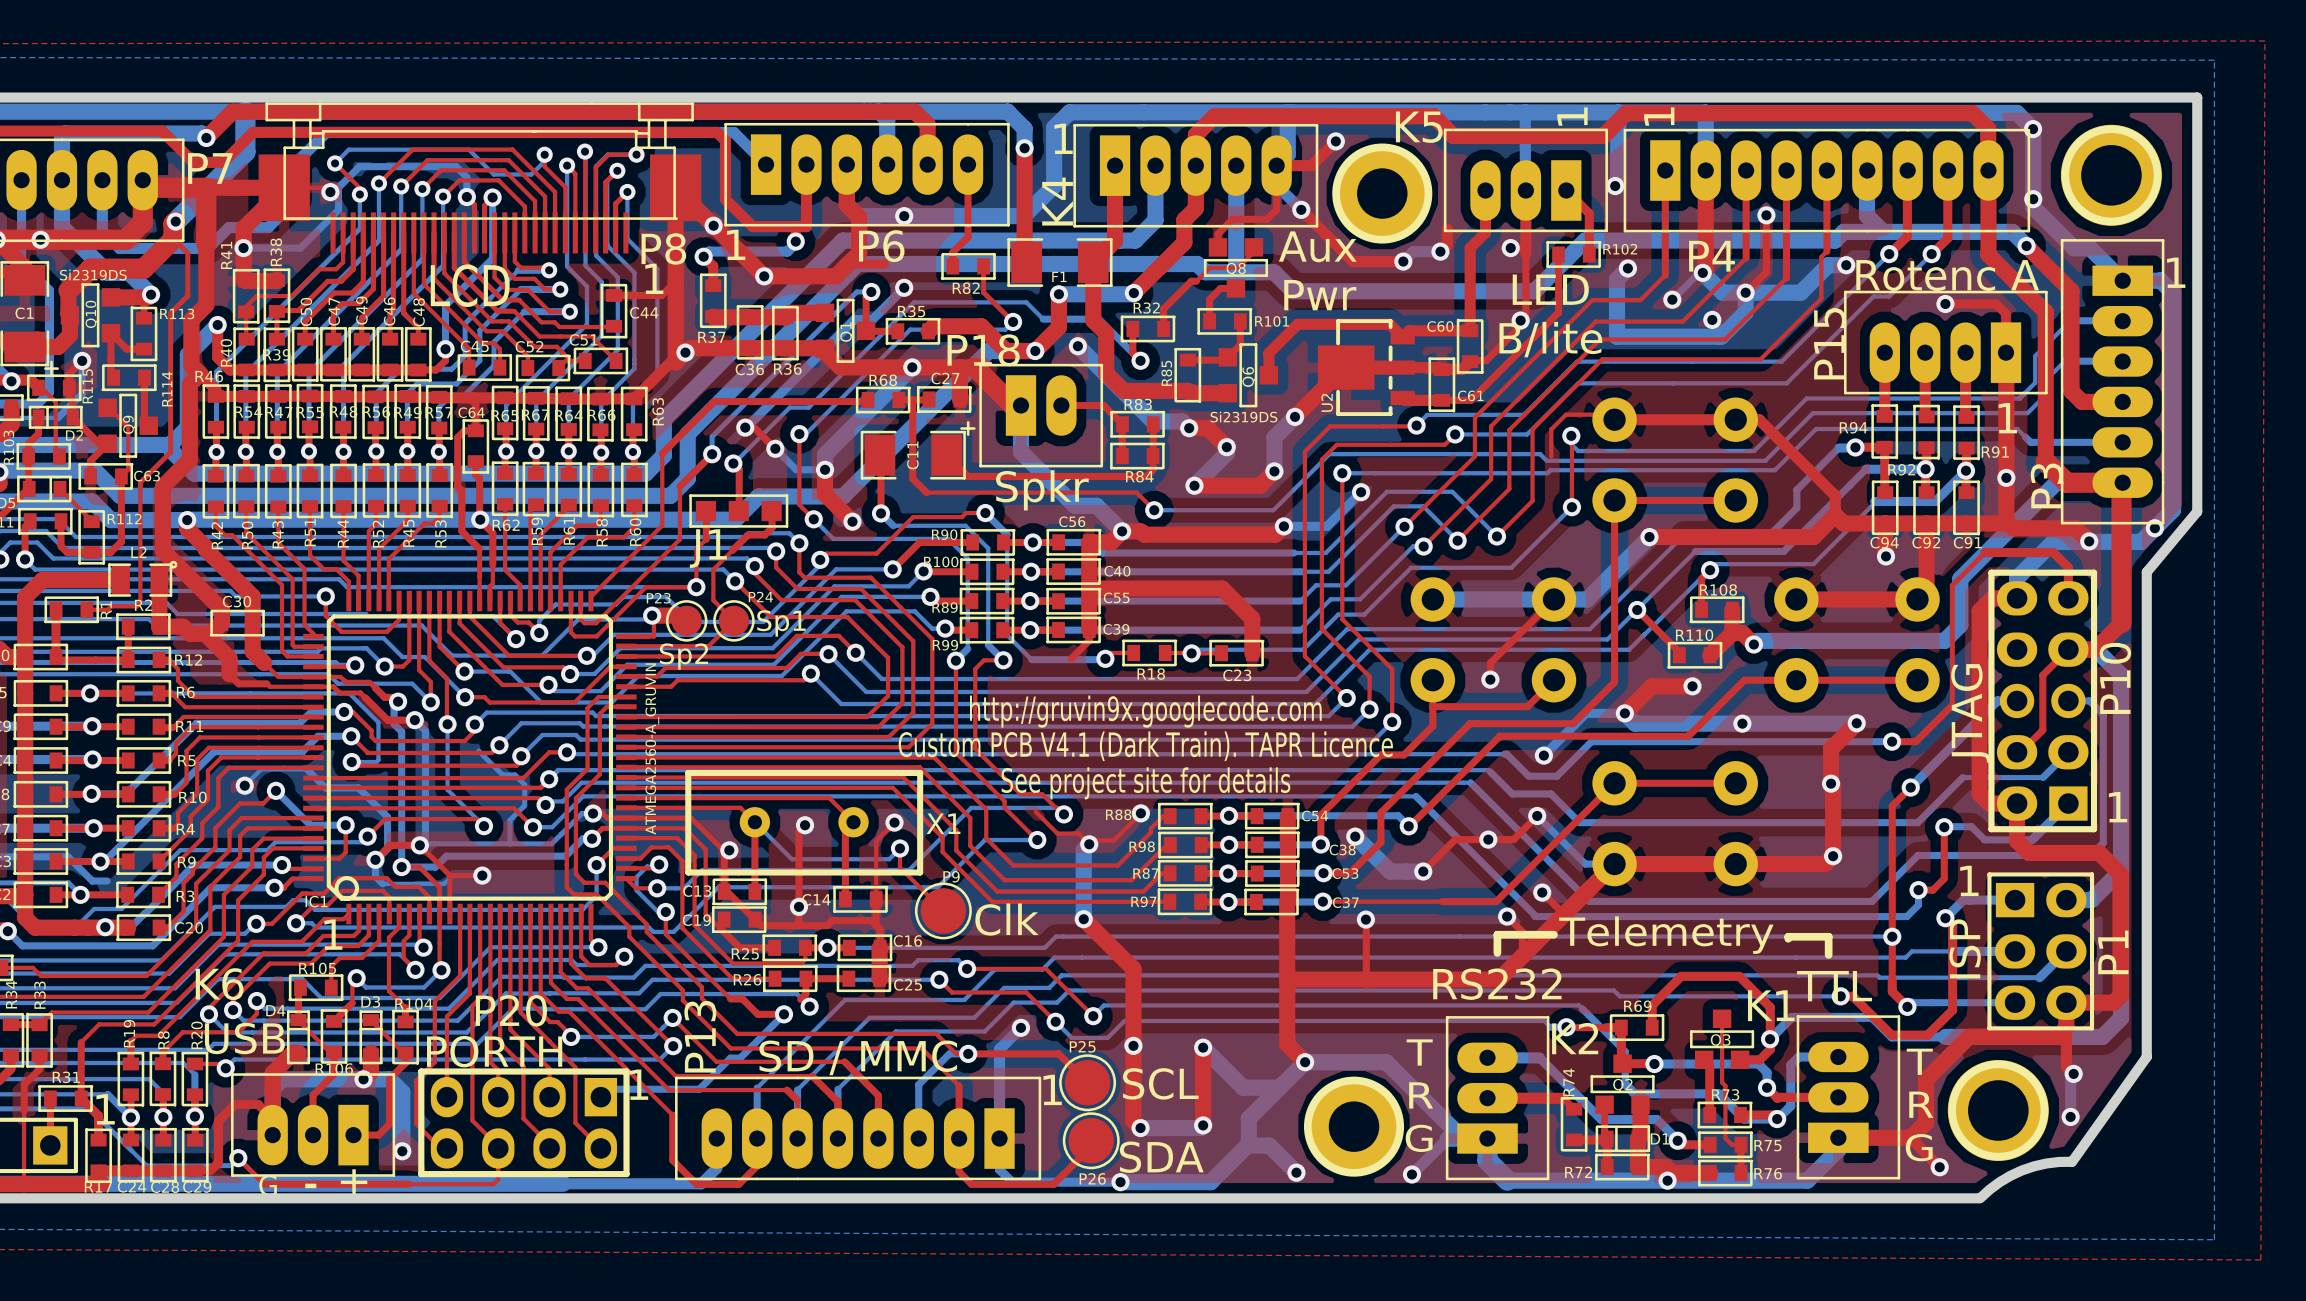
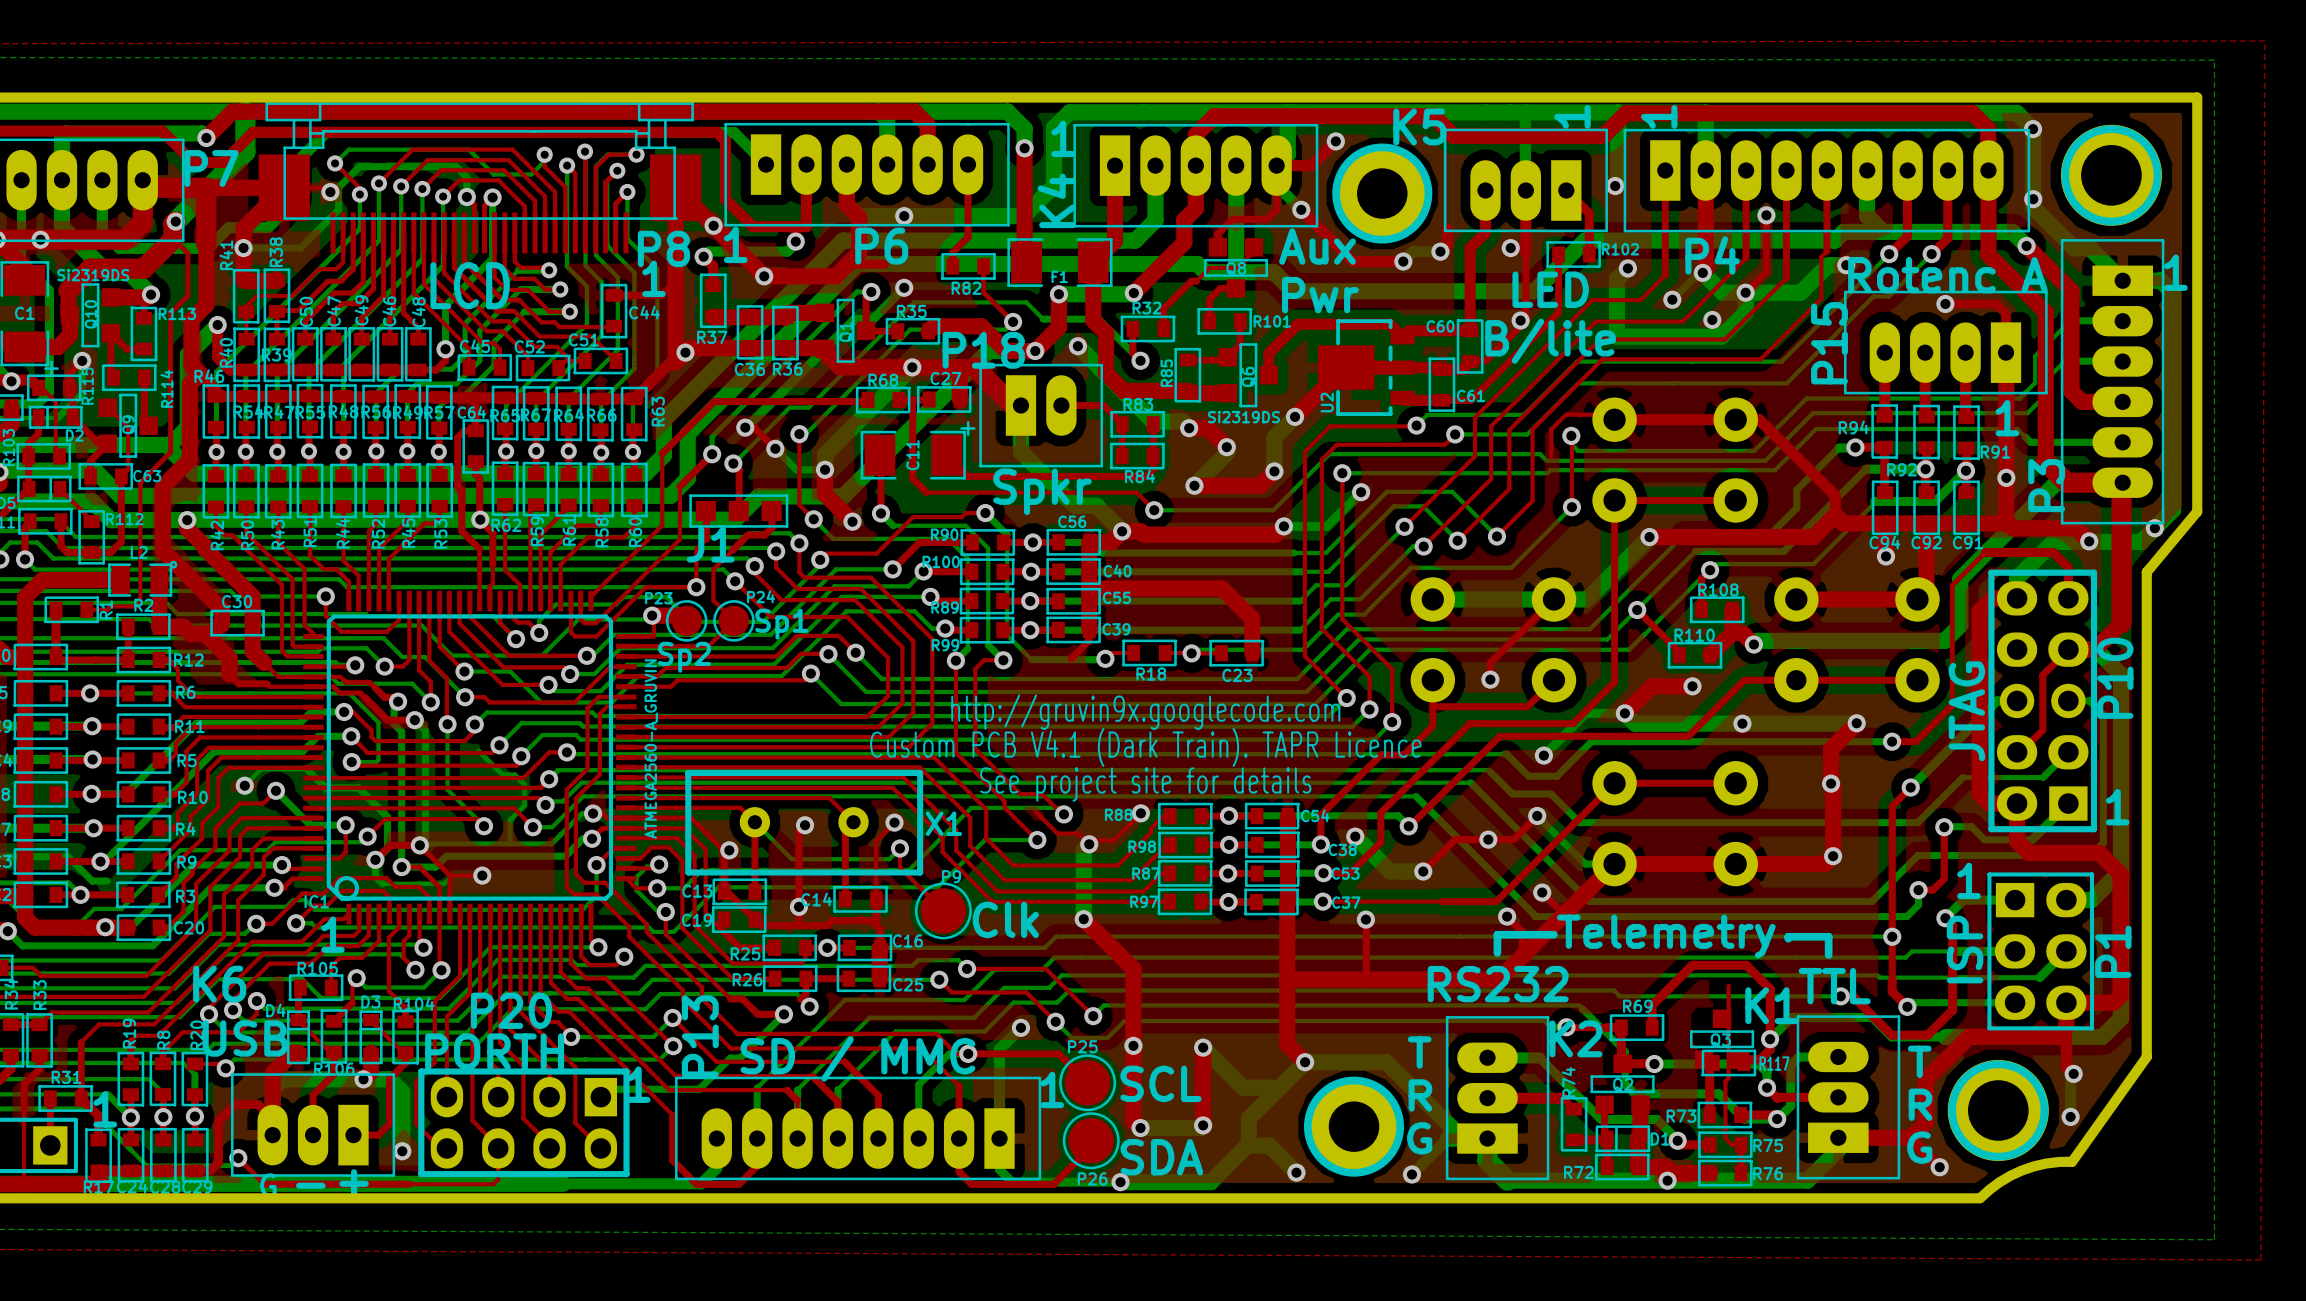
top track: (1681, 976) (1739, 976) (1770, 1007) -> (1681, 976) (1692, 965) (1746, 965) (1770, 989) (1770, 1007)
top track: (1722, 1018) (1722, 1082) (1725, 1085) -> (1728, 985) (1728, 1078) (1725, 1081) (1725, 1085)
R117: none -> (1728, 1062)
R73 name position: R73 (1725, 1094) -> R73 (1681, 1116)

